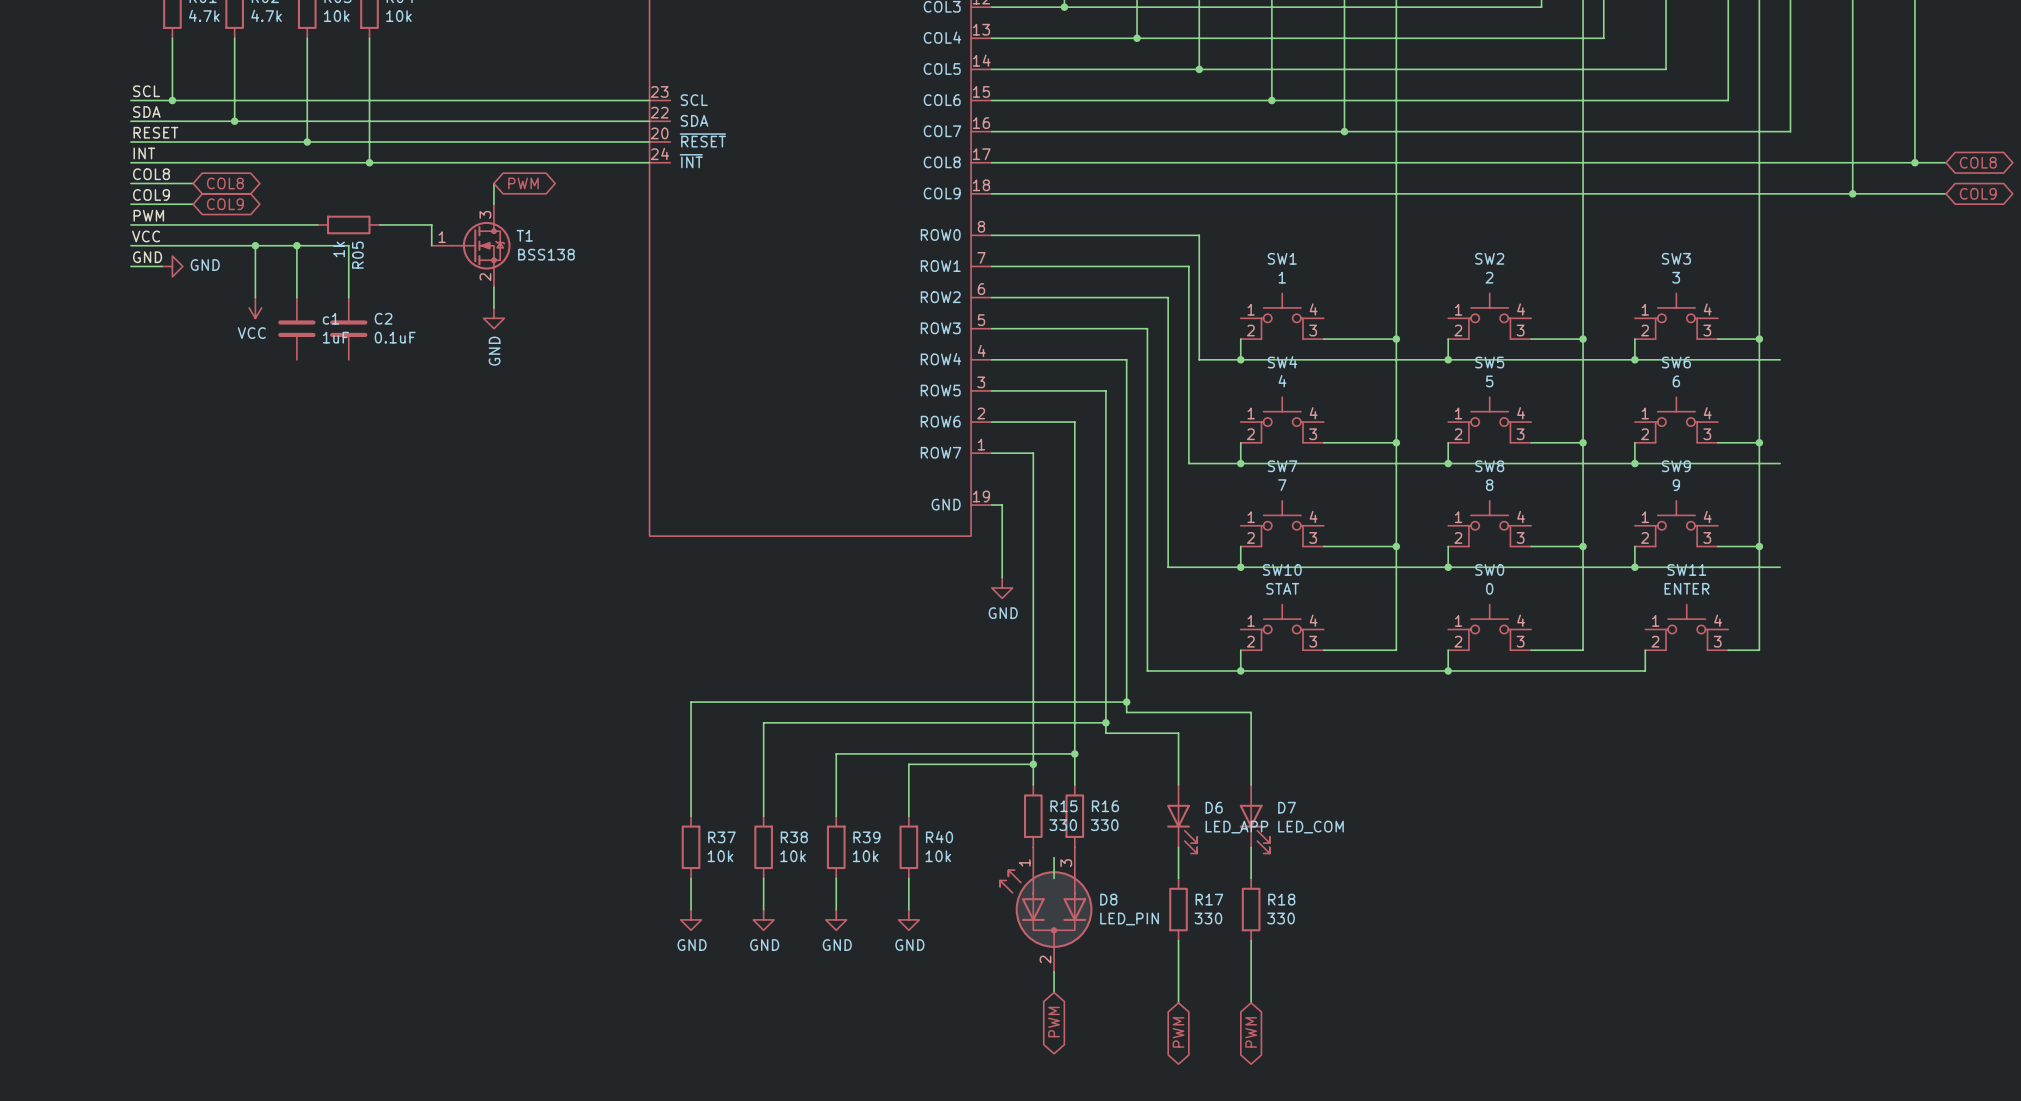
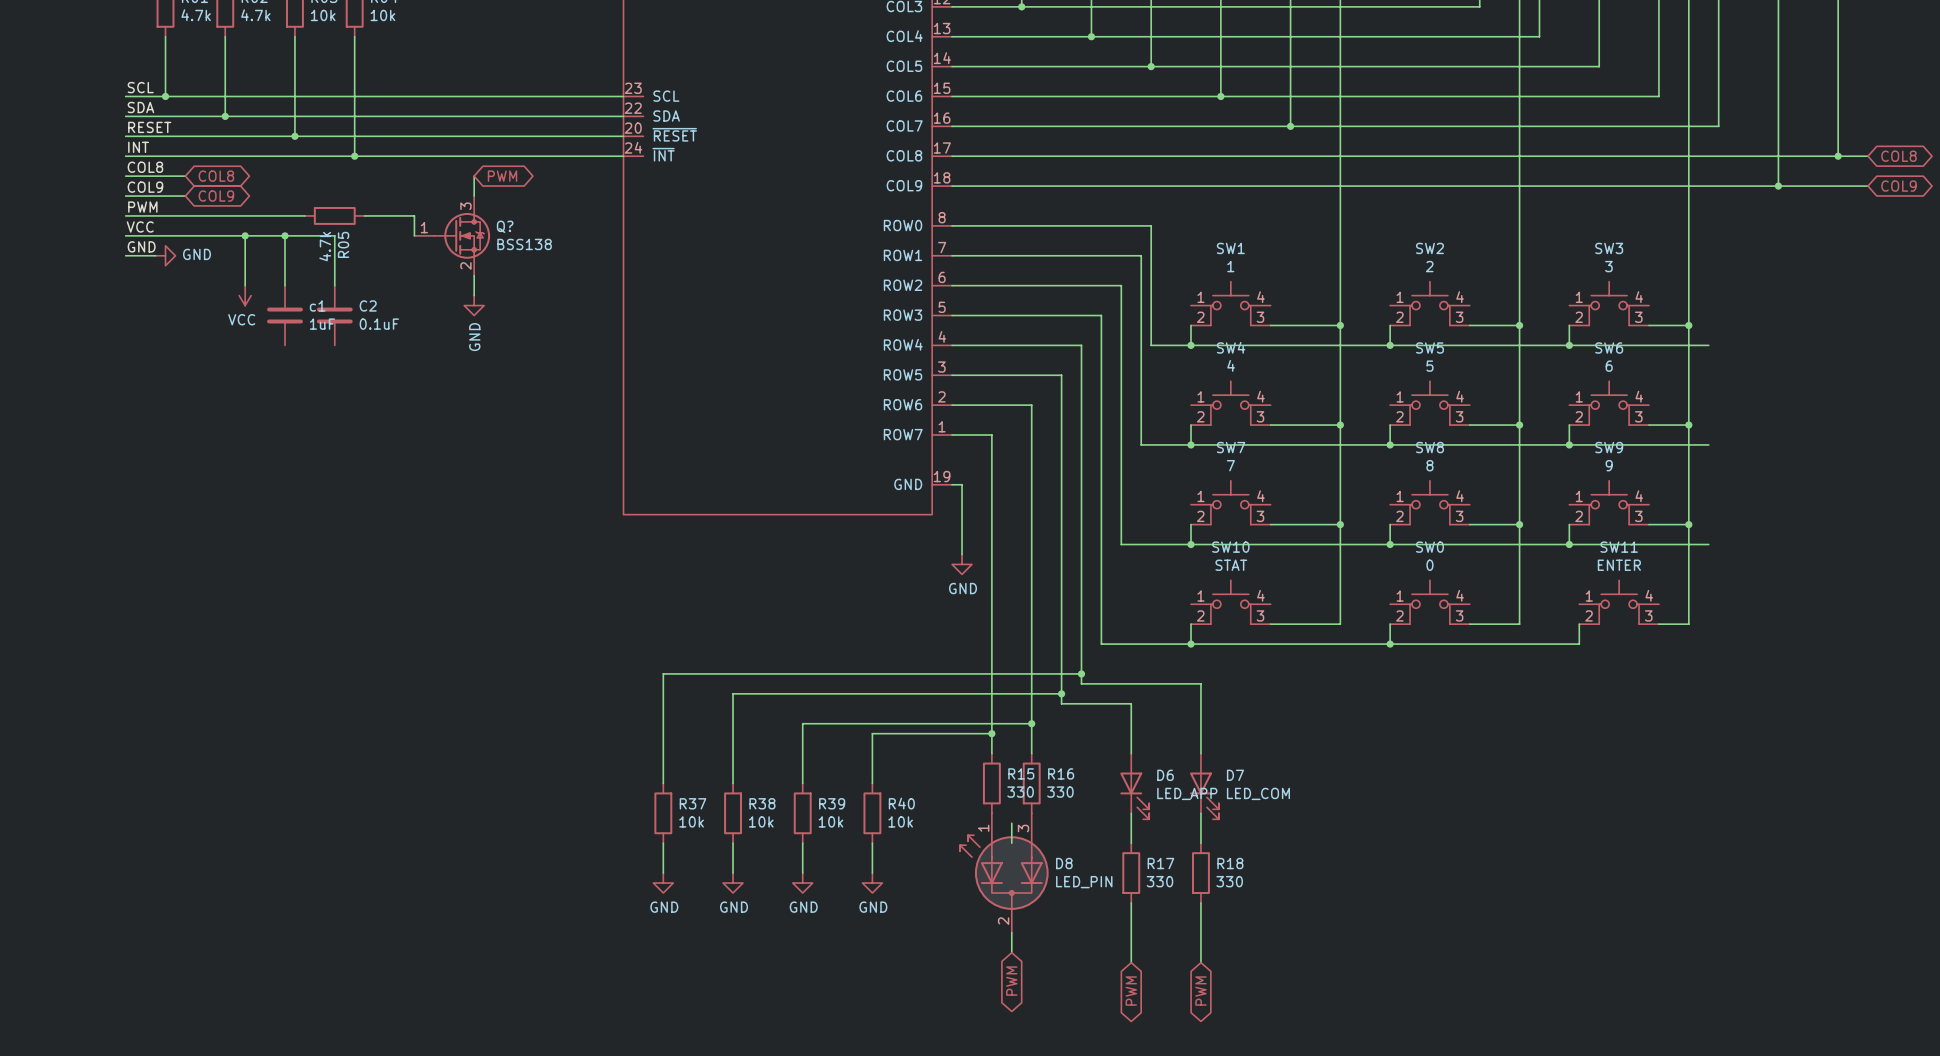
T1 name: T1 (524, 235) -> Q? (505, 226)
R05 value: 1k (339, 249) -> 4.7k (325, 246)

